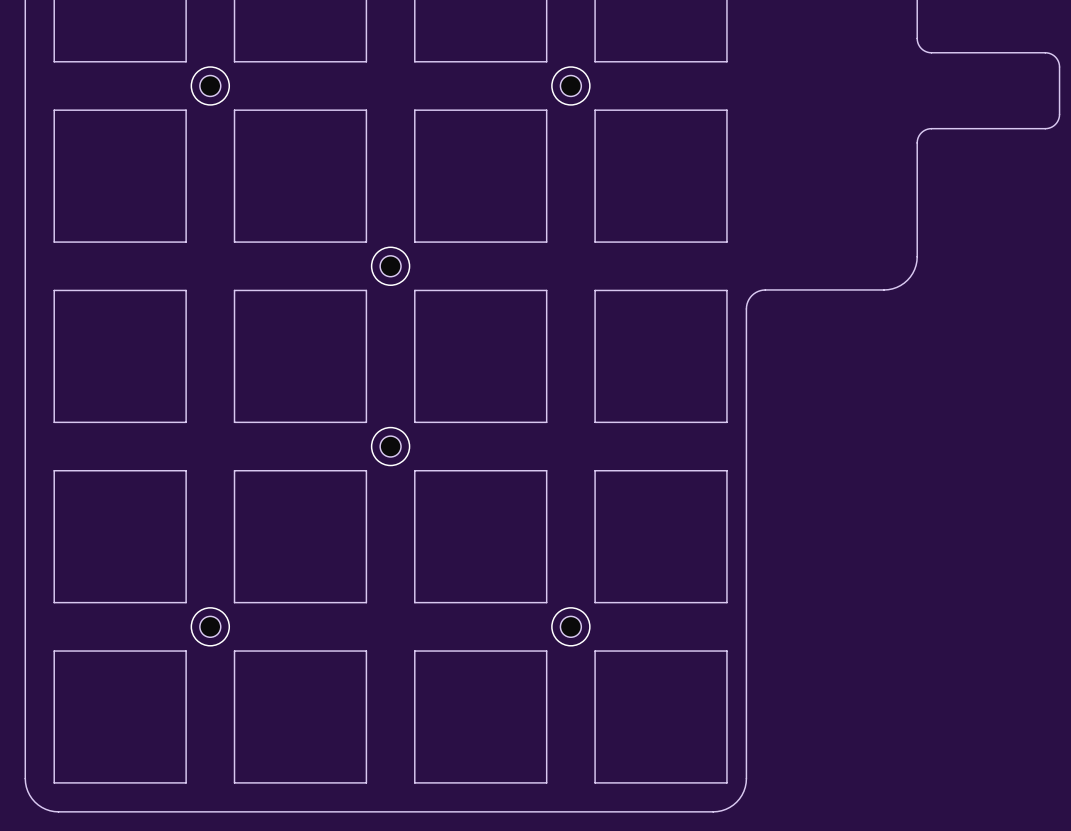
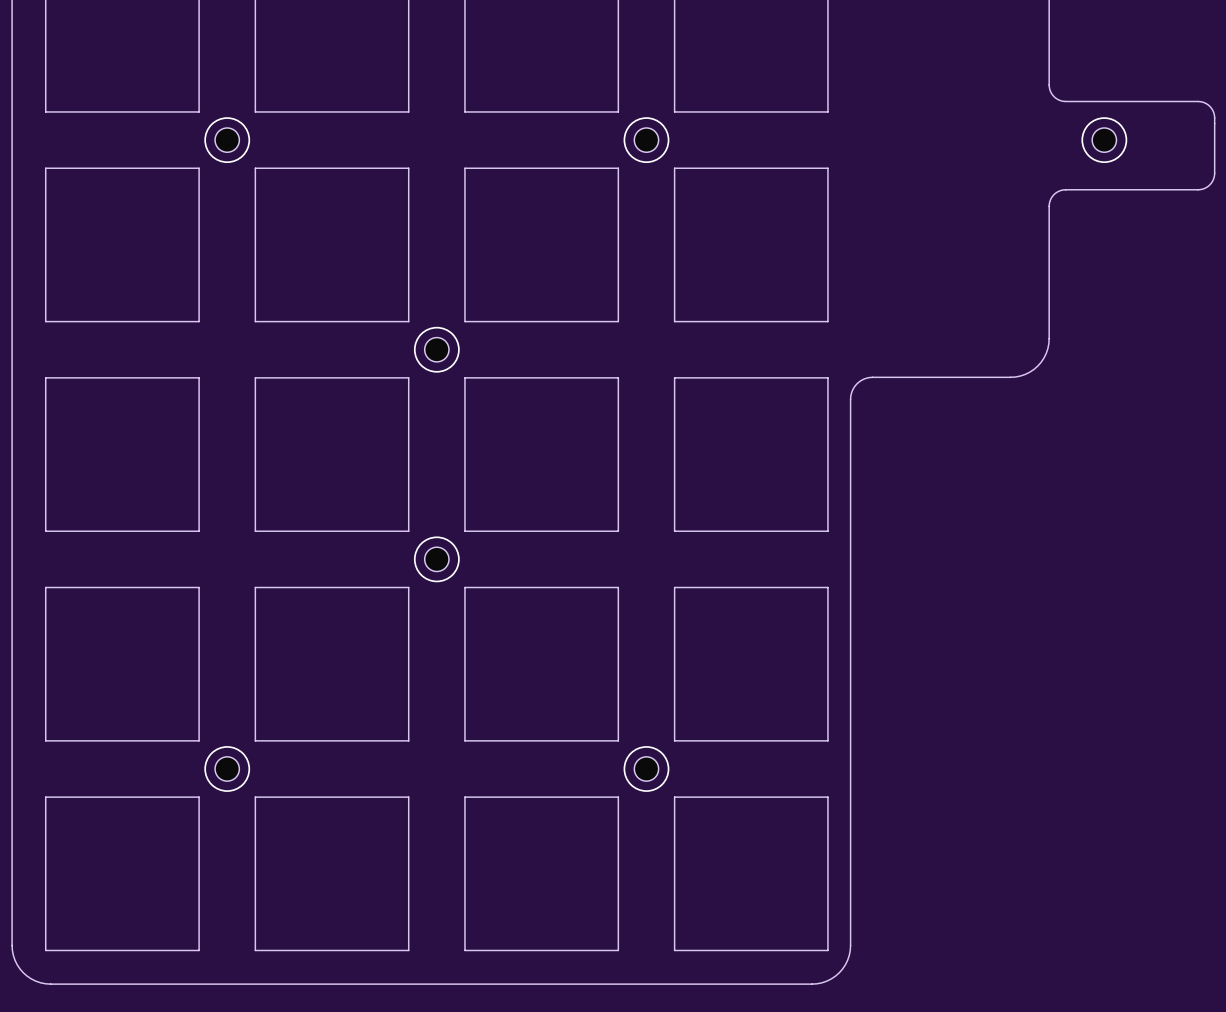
part: none -> (1104, 140)

